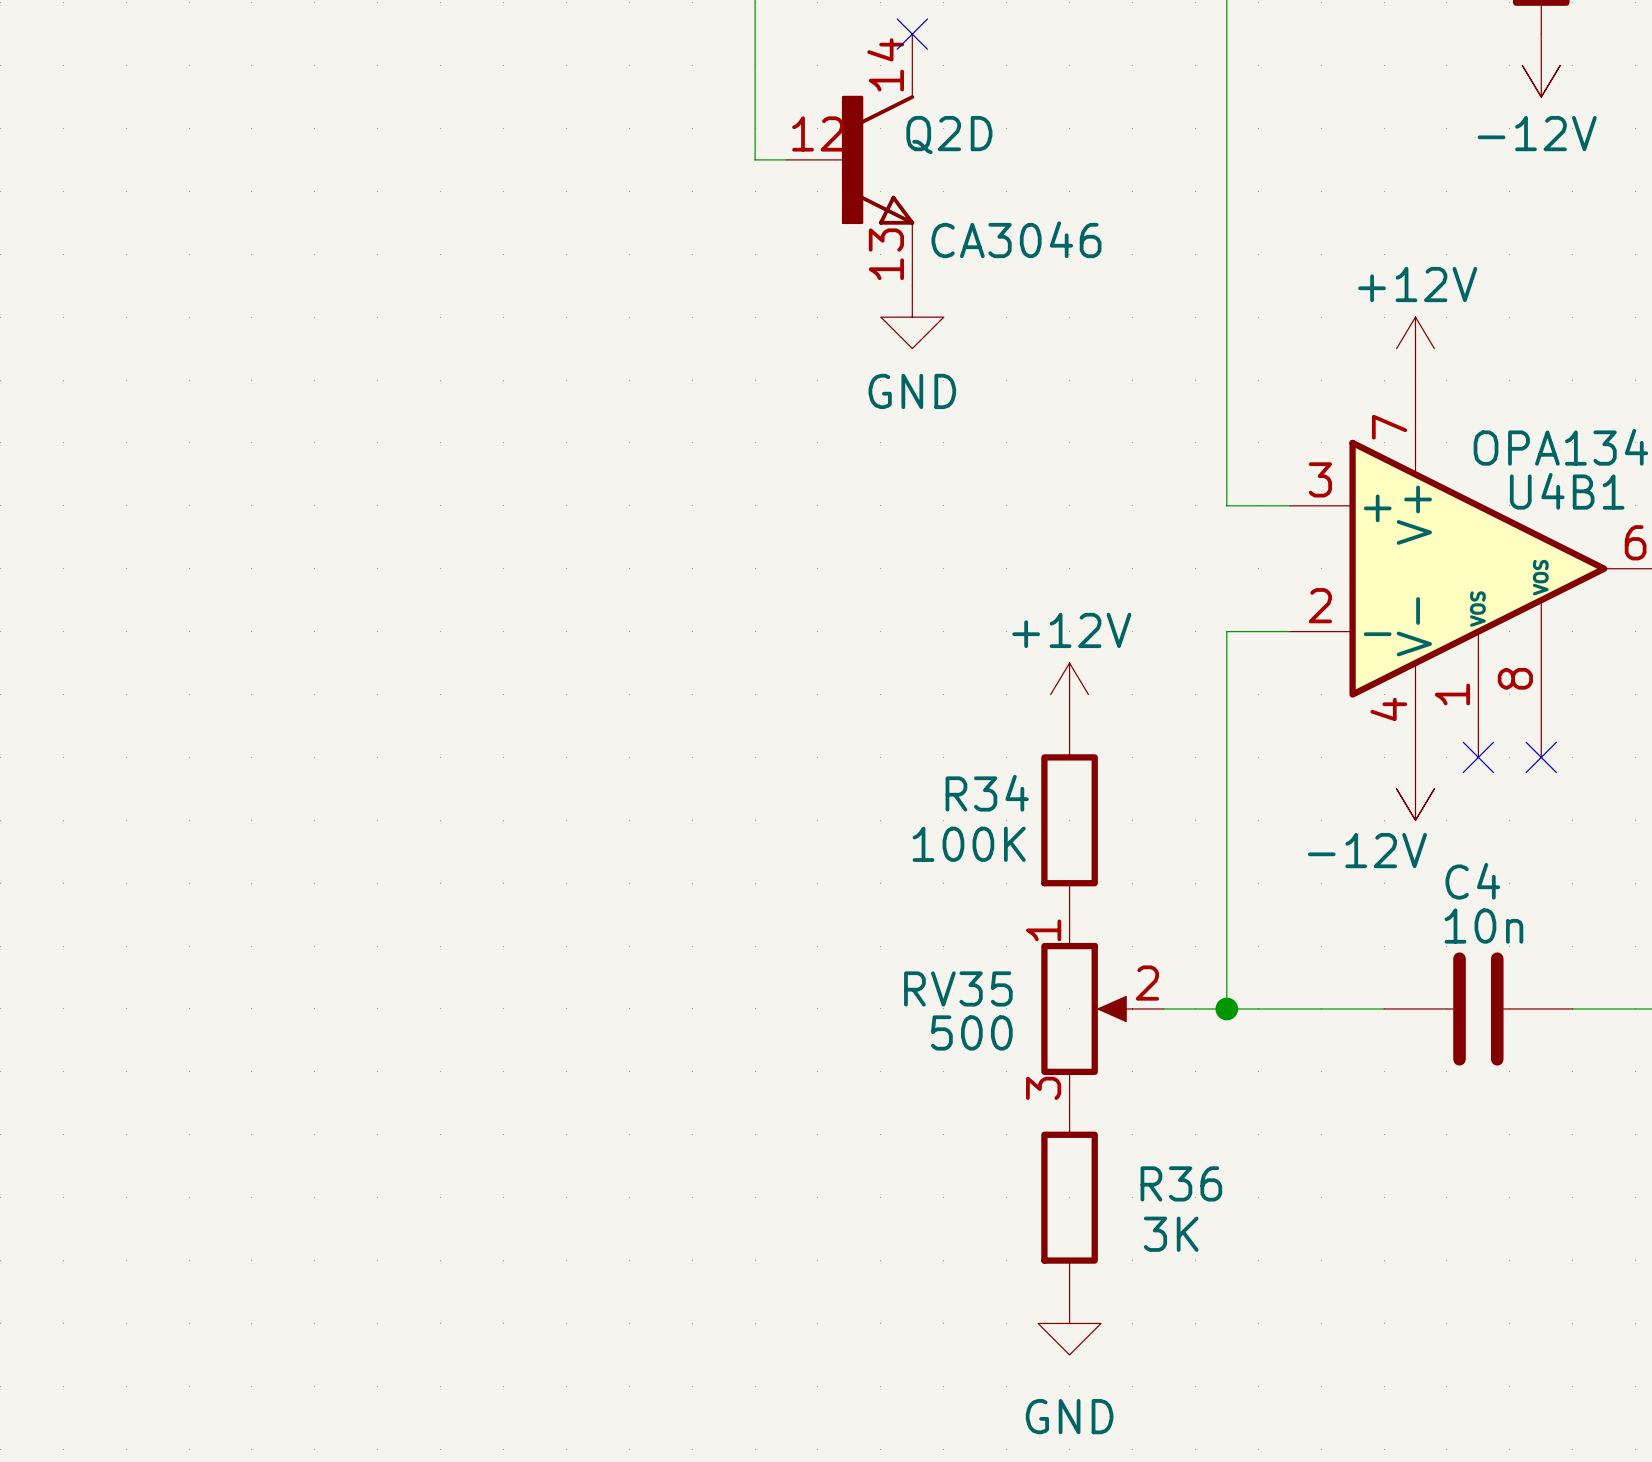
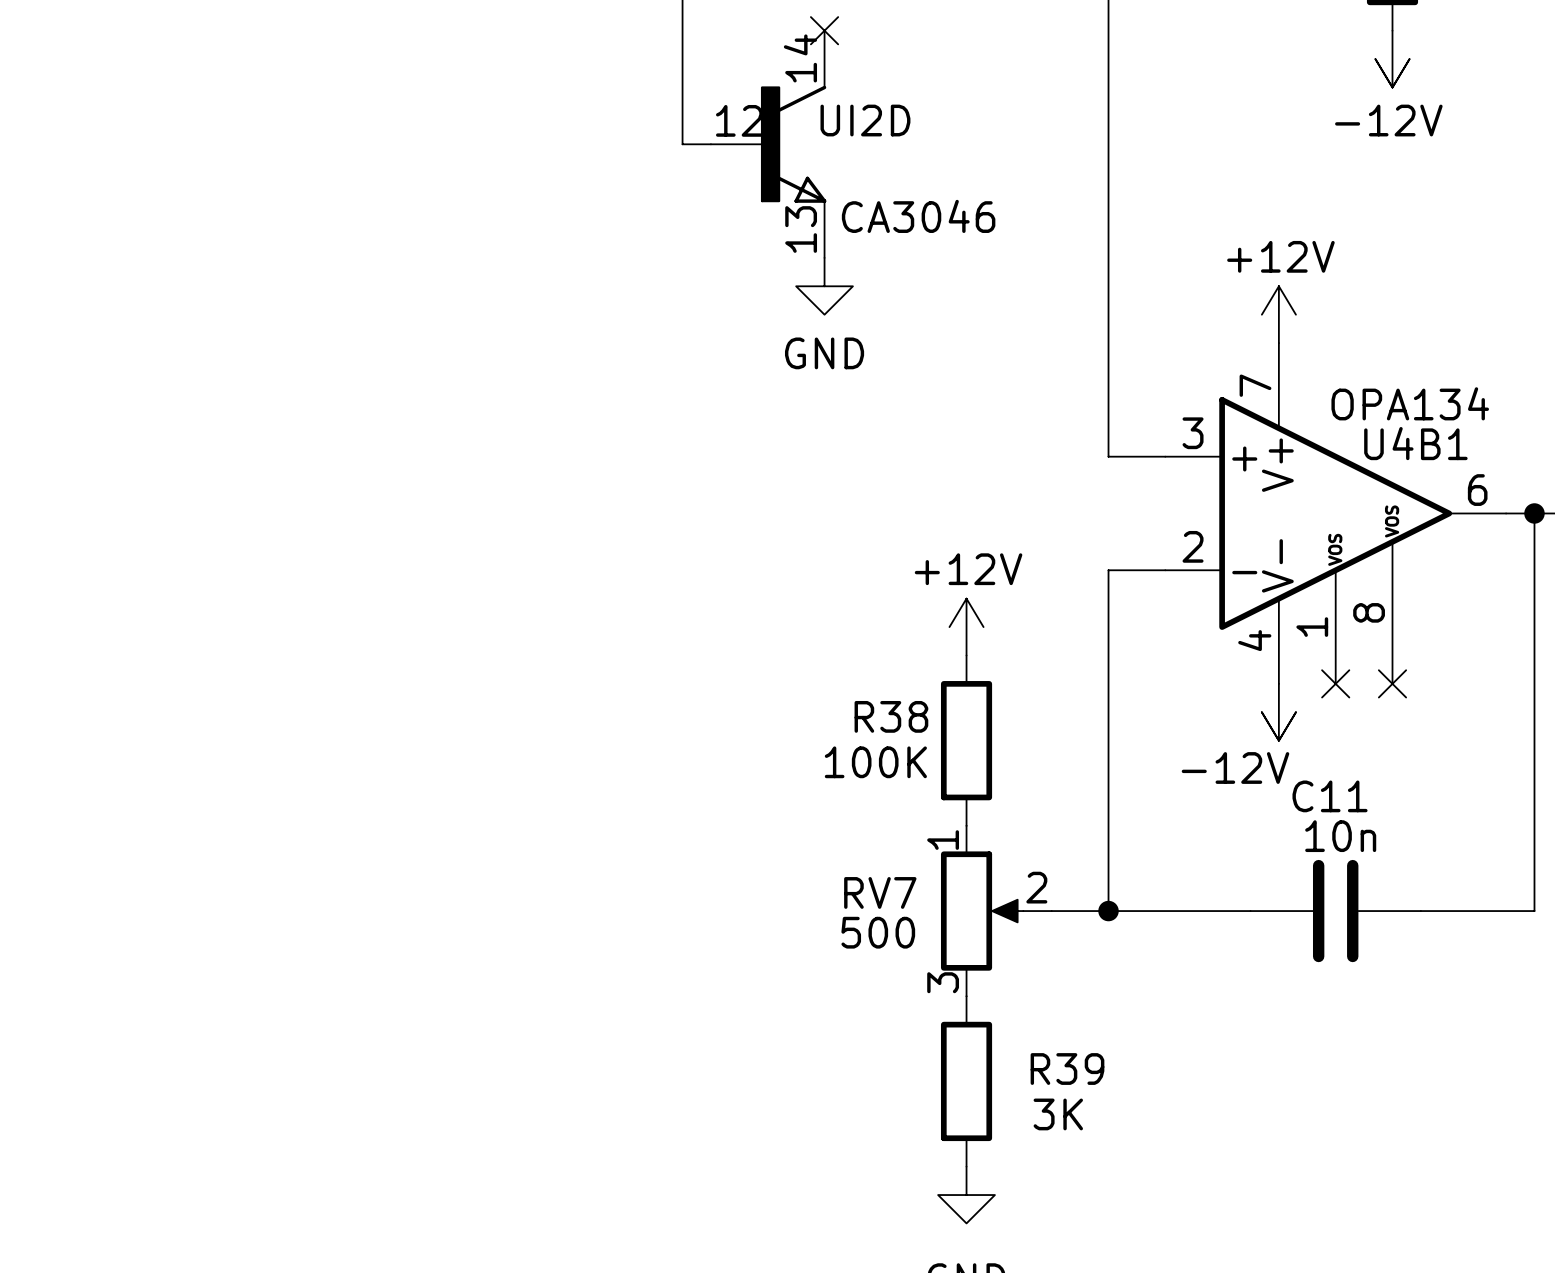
Q2D name: Q2D (949, 135) -> UI2D (865, 120)
R34 name: R34 (987, 793) -> R38 (891, 716)
C4 name: C4 (1472, 881) -> C11 (1330, 796)
RV35 name: RV35 (958, 988) -> RV7 (880, 892)
R36 name: R36 (1181, 1183) -> R39 (1067, 1069)

